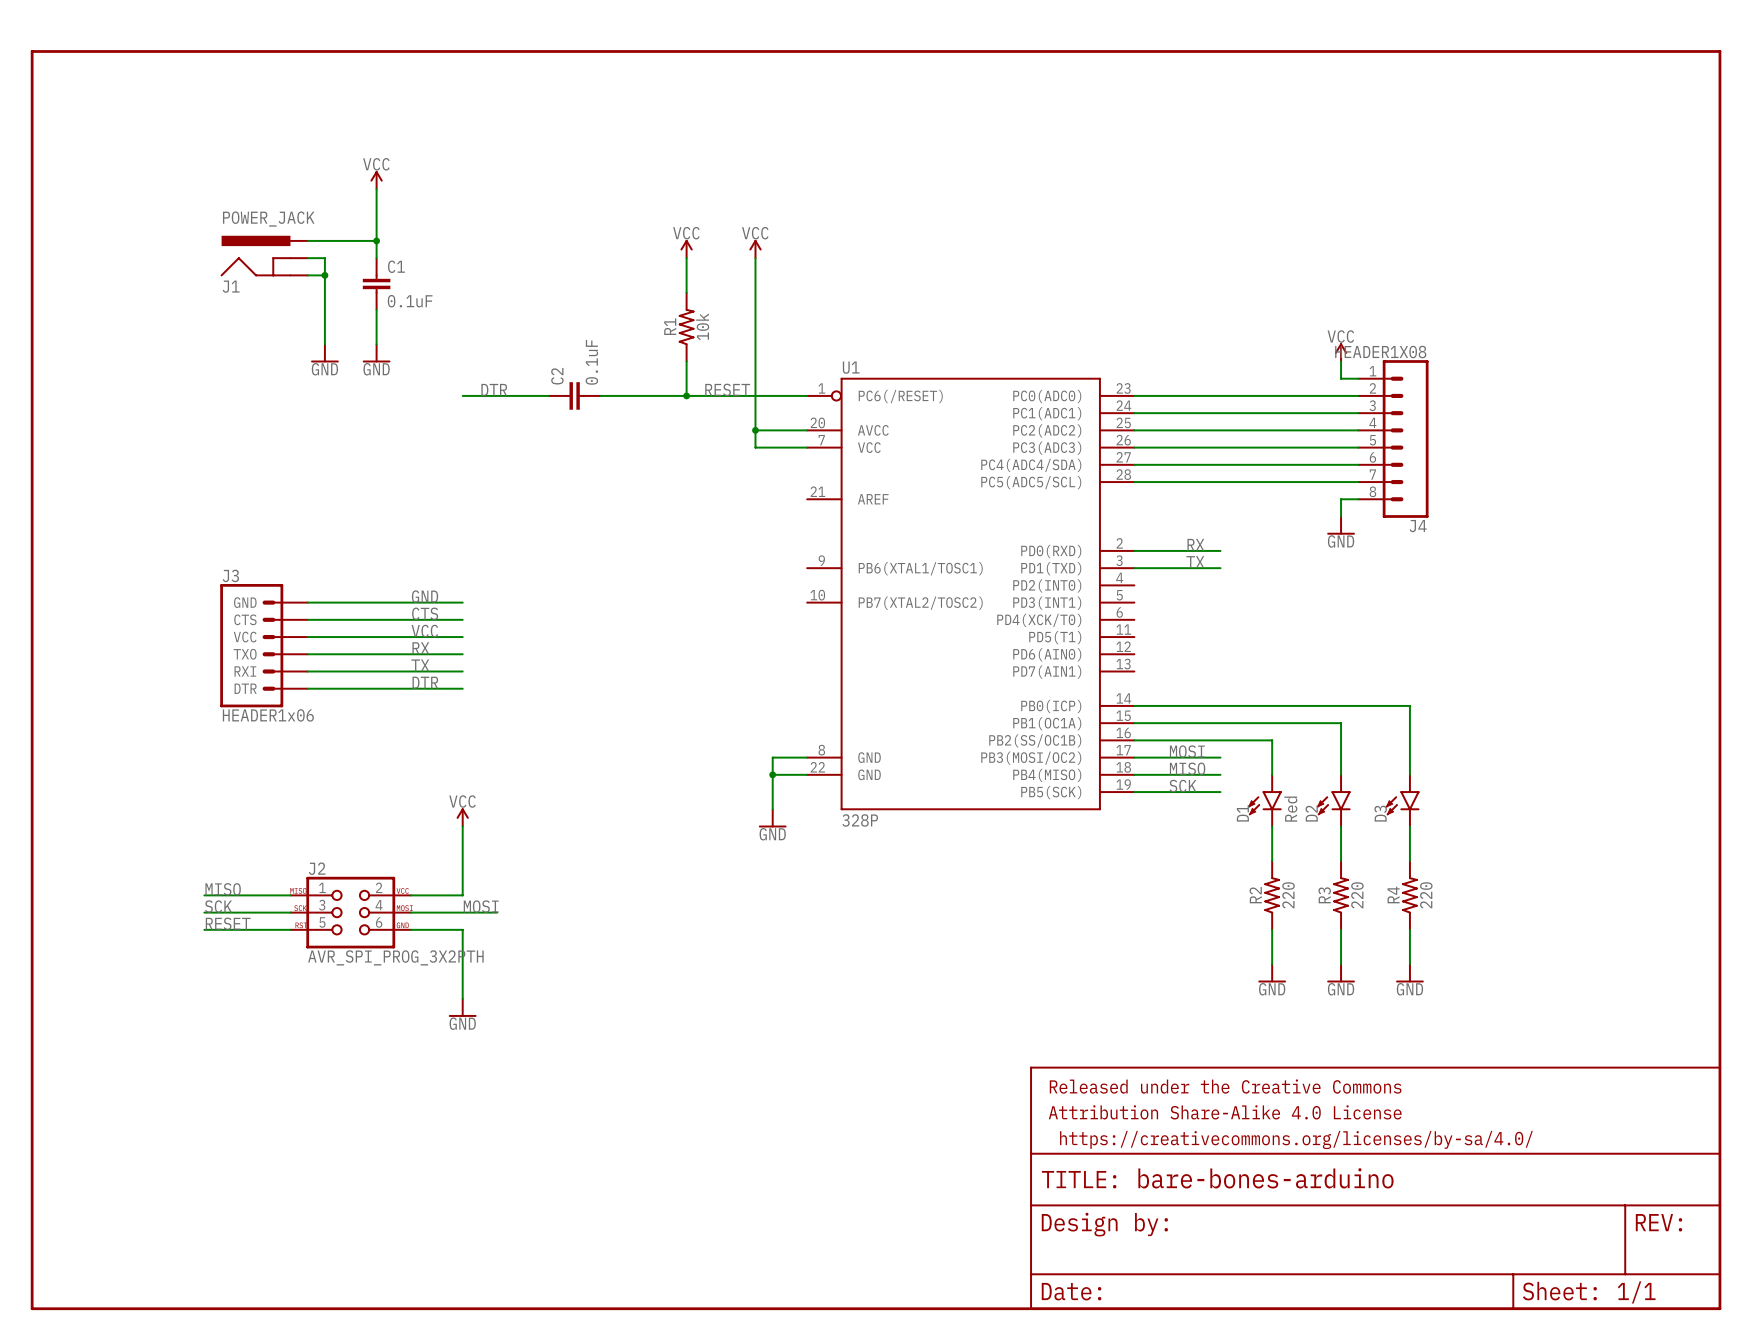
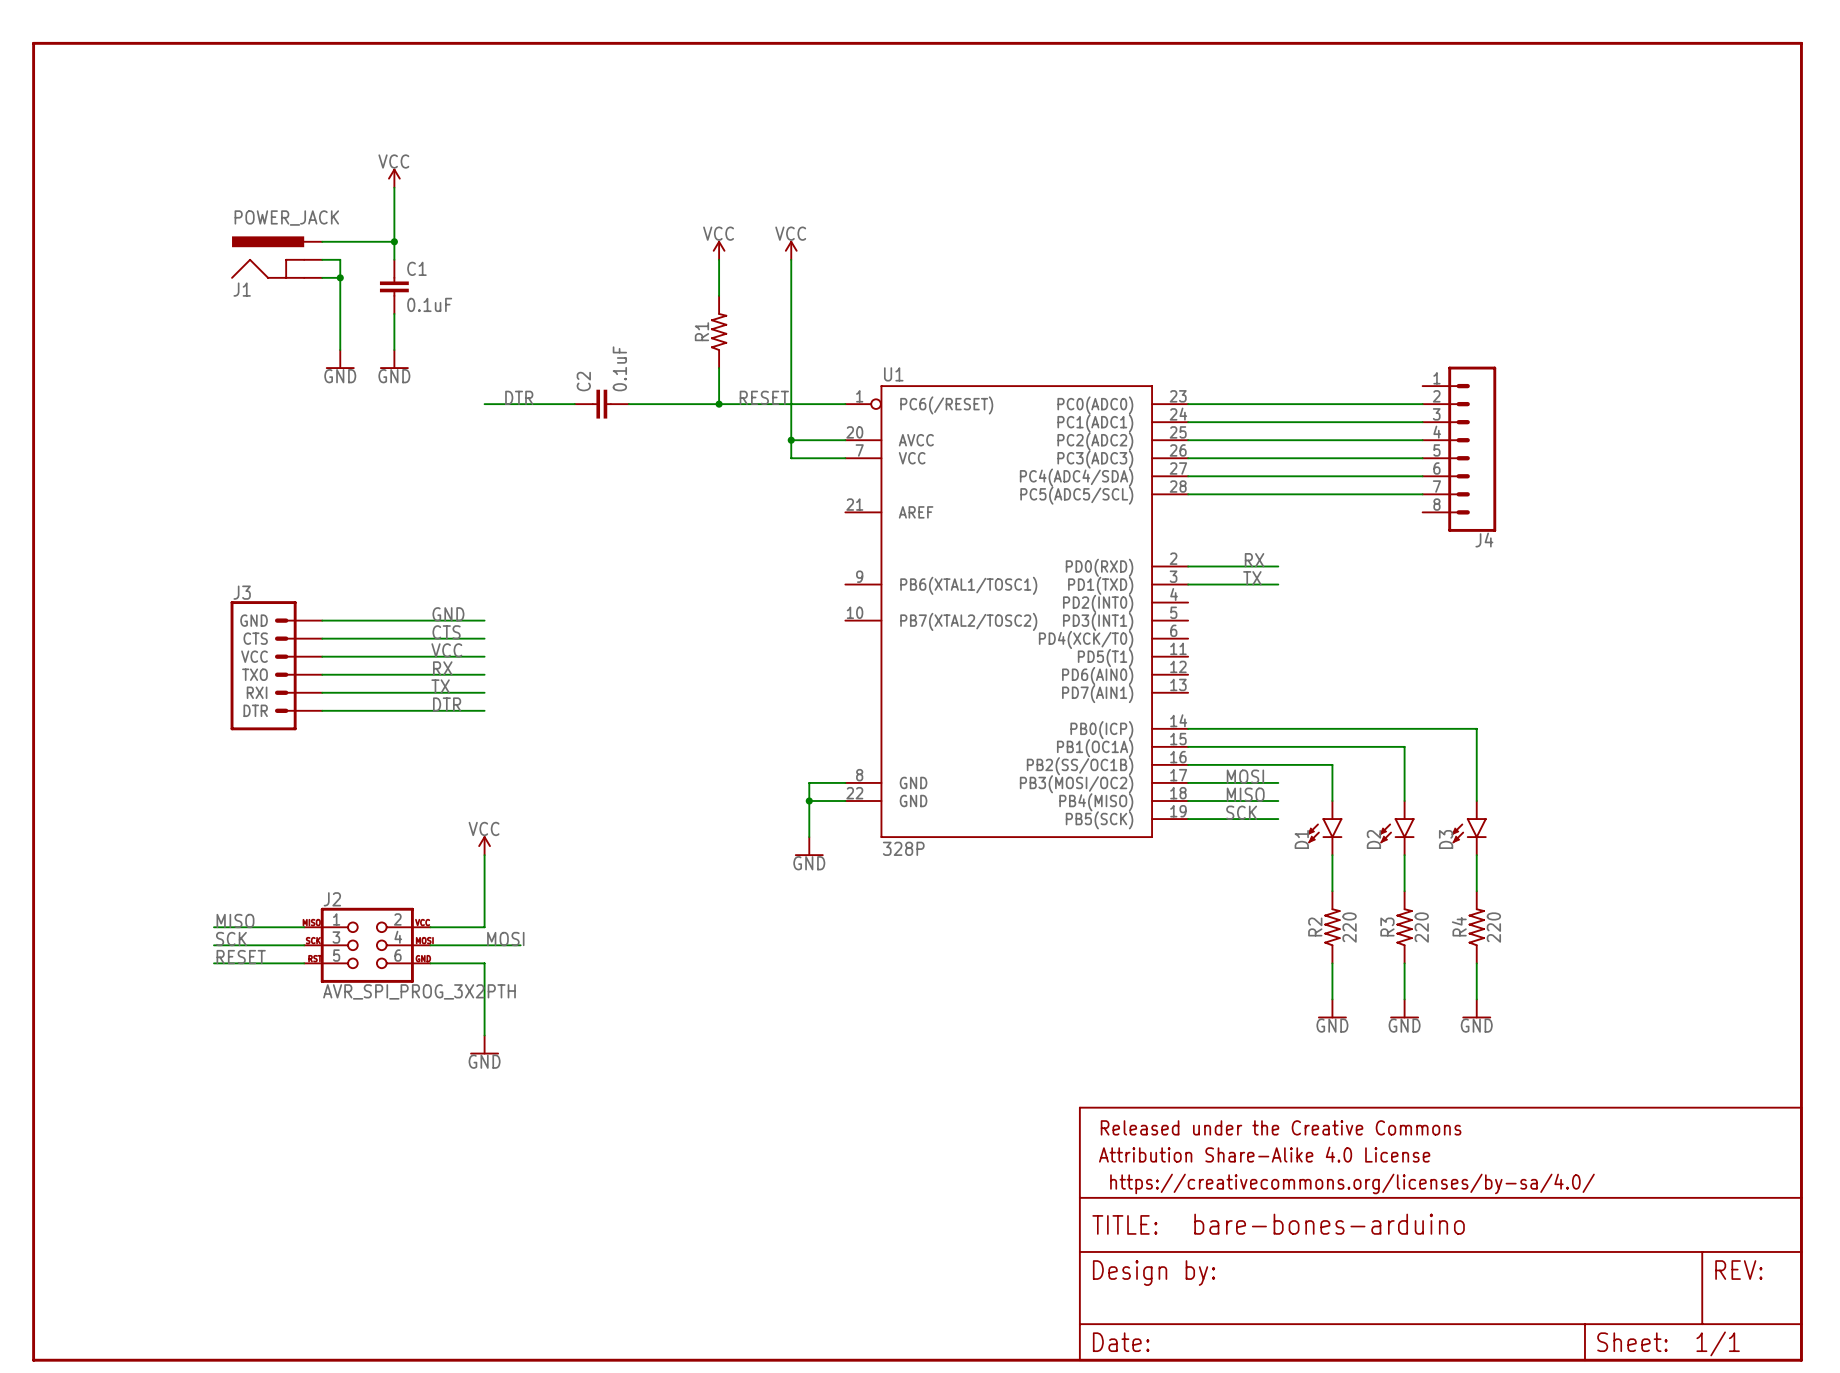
R1 value: 10k (702, 326) -> none
power symbol: VCC (1341, 352) -> none
J4 value: HEADER1X08 (1380, 352) -> none
wire: (1341, 361) (1341, 378) (1358, 378) -> none
wire: (1358, 499) (1341, 499) (1341, 516) -> none
power symbol: GND (1341, 525) -> none
J3 value: HEADER1x06 (268, 715) -> none
D1 value: Red (1290, 809) -> none

